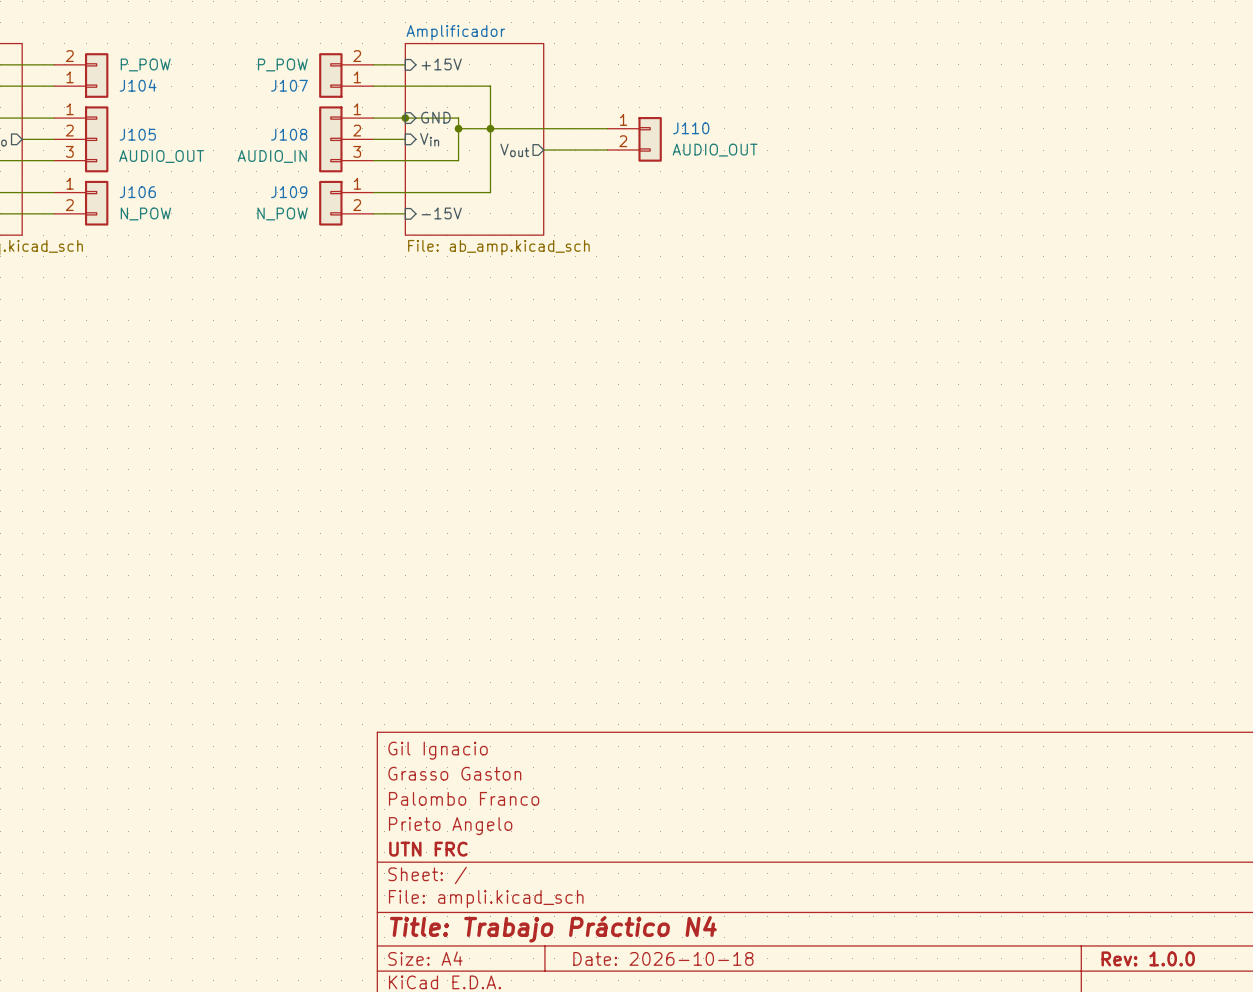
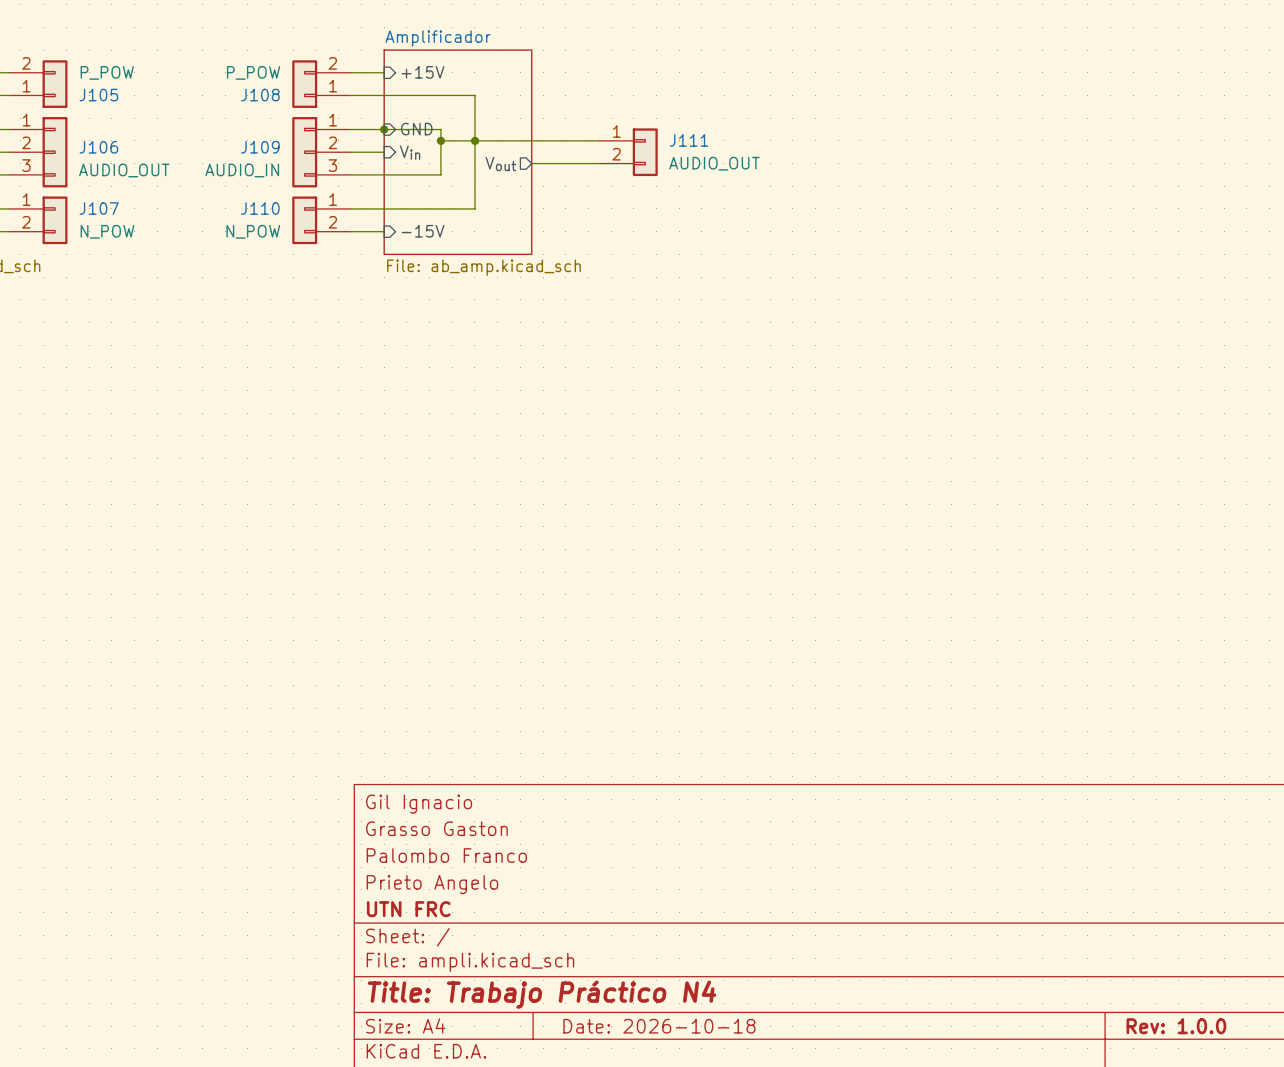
J104 name: J104 (138, 85) -> J105 (98, 95)
J107 name: J107 (289, 85) -> J108 (260, 95)
J110 name: J110 (691, 128) -> J111 (689, 140)
J105 name: J105 (137, 134) -> J106 (98, 147)
J108 name: J108 (289, 134) -> J109 (260, 147)
J106 name: J106 (137, 192) -> J107 (99, 208)
J109 name: J109 (289, 192) -> J110 (260, 208)

